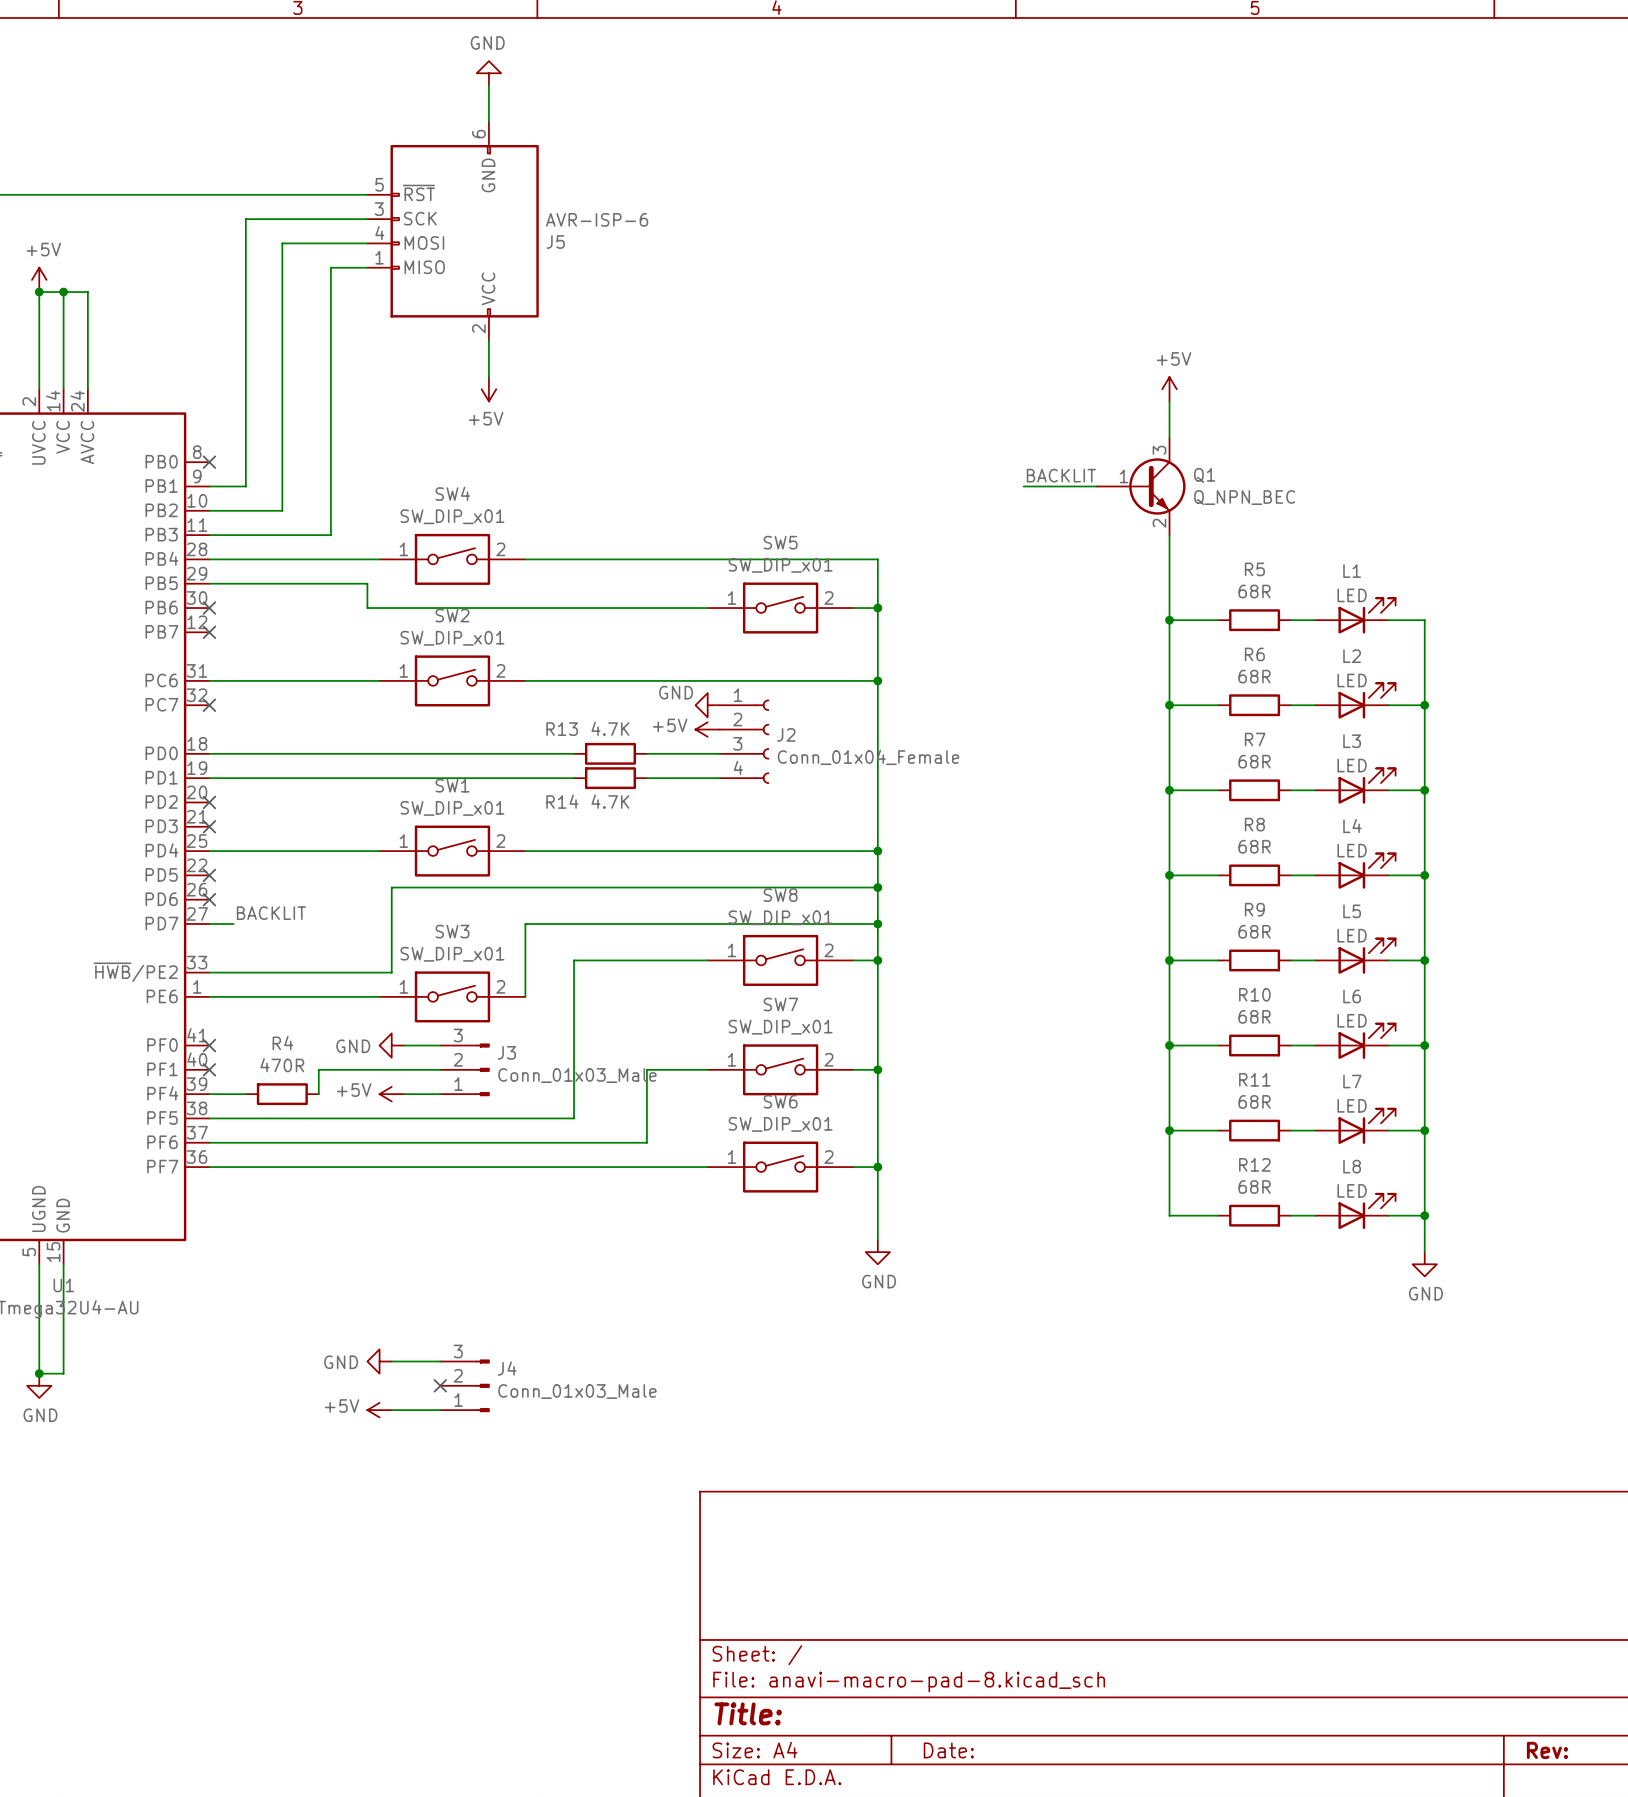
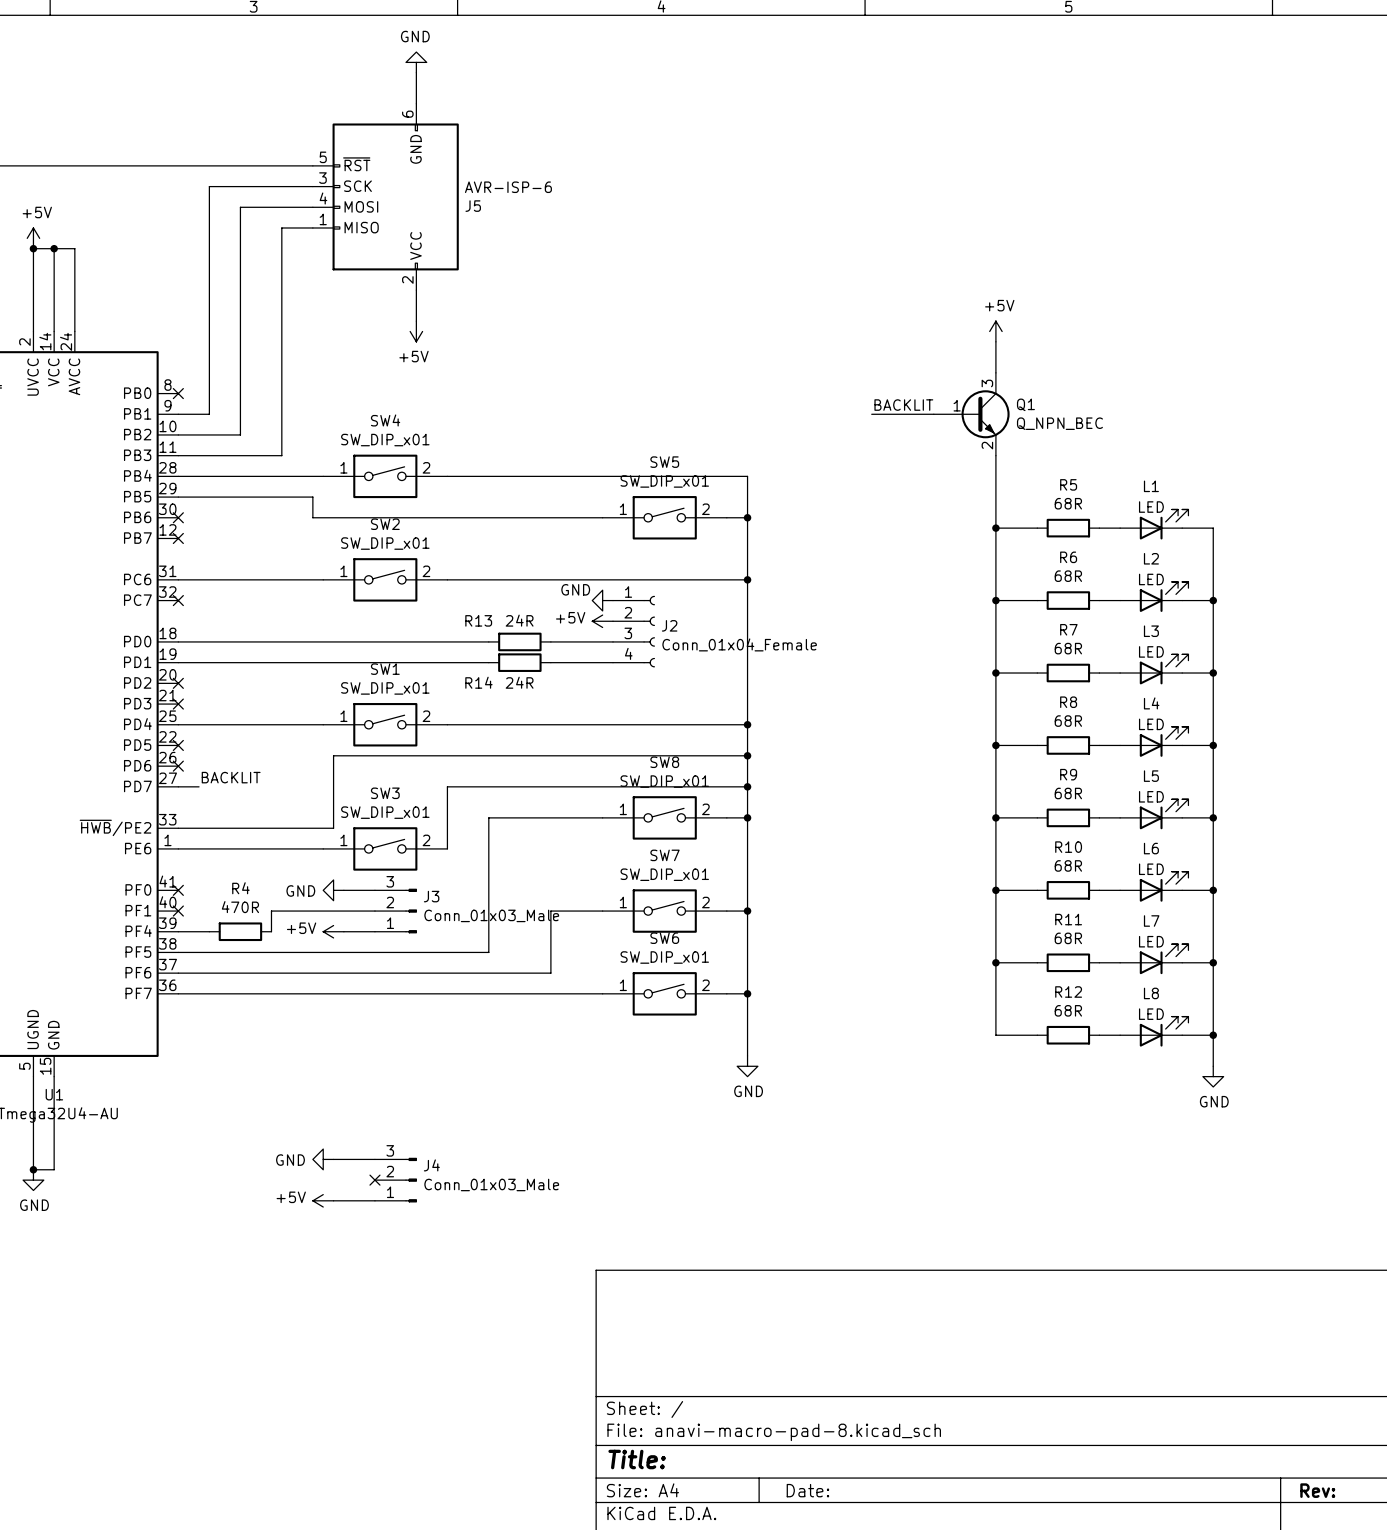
R13 value: 4.7K (610, 728) -> 24R (519, 620)
R14 value: 4.7K (610, 801) -> 24R (519, 682)

